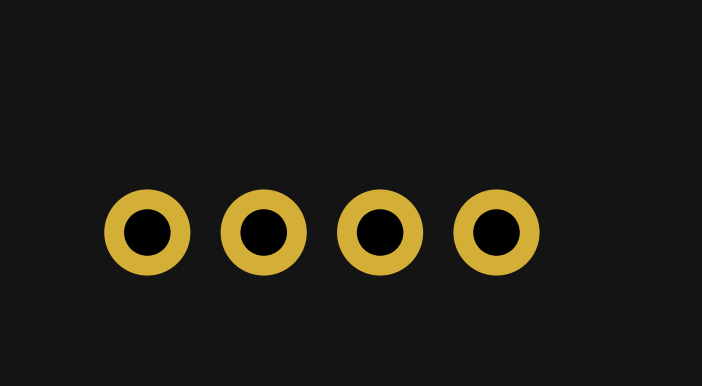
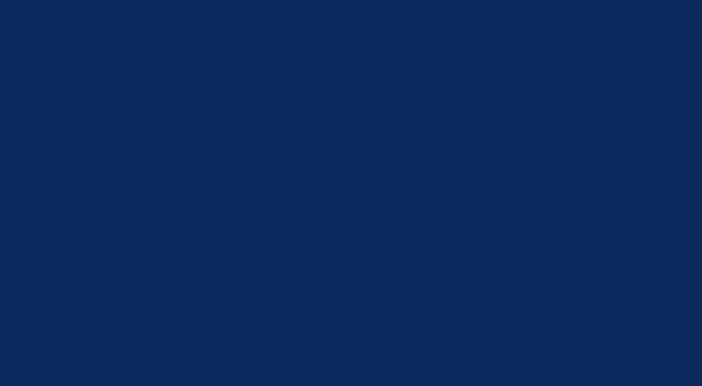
part: (321, 232) -> none

